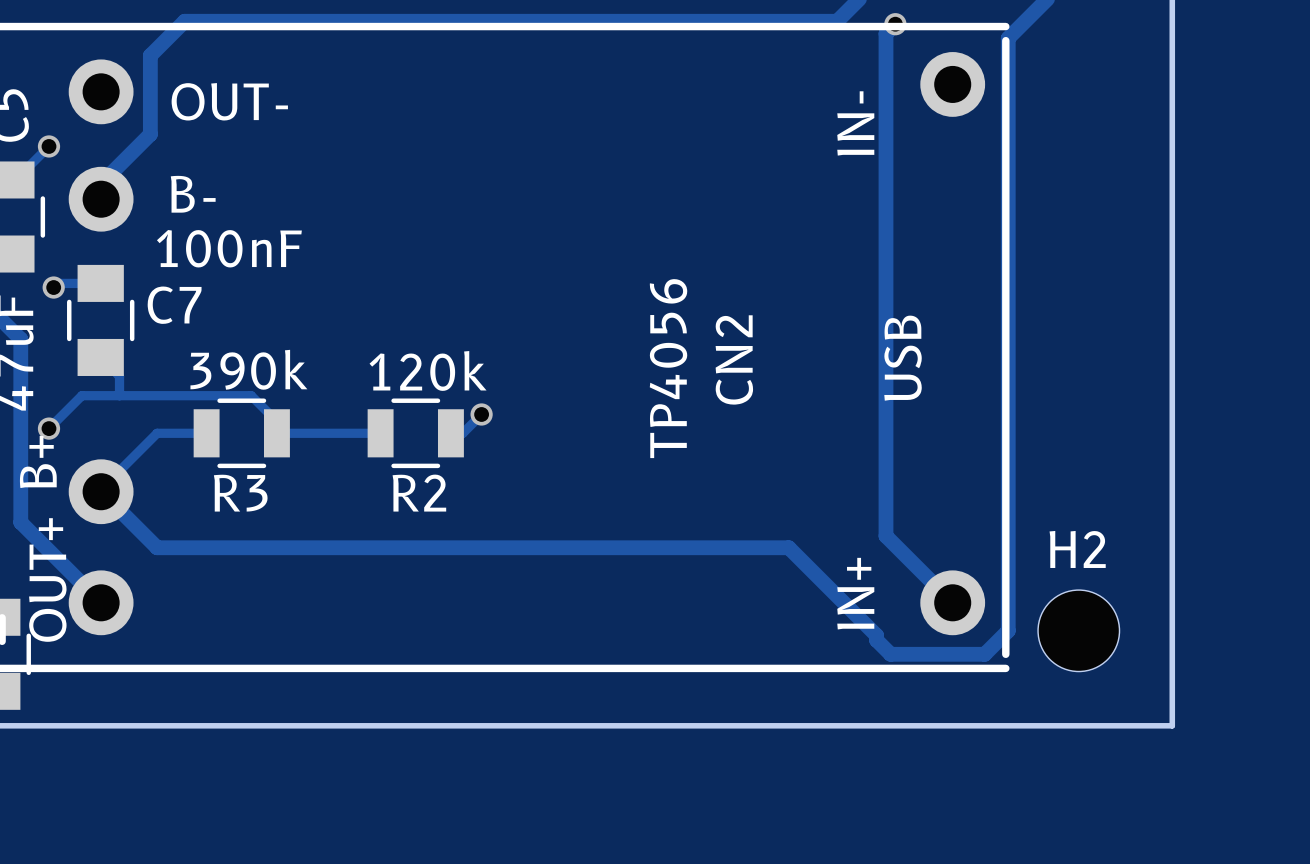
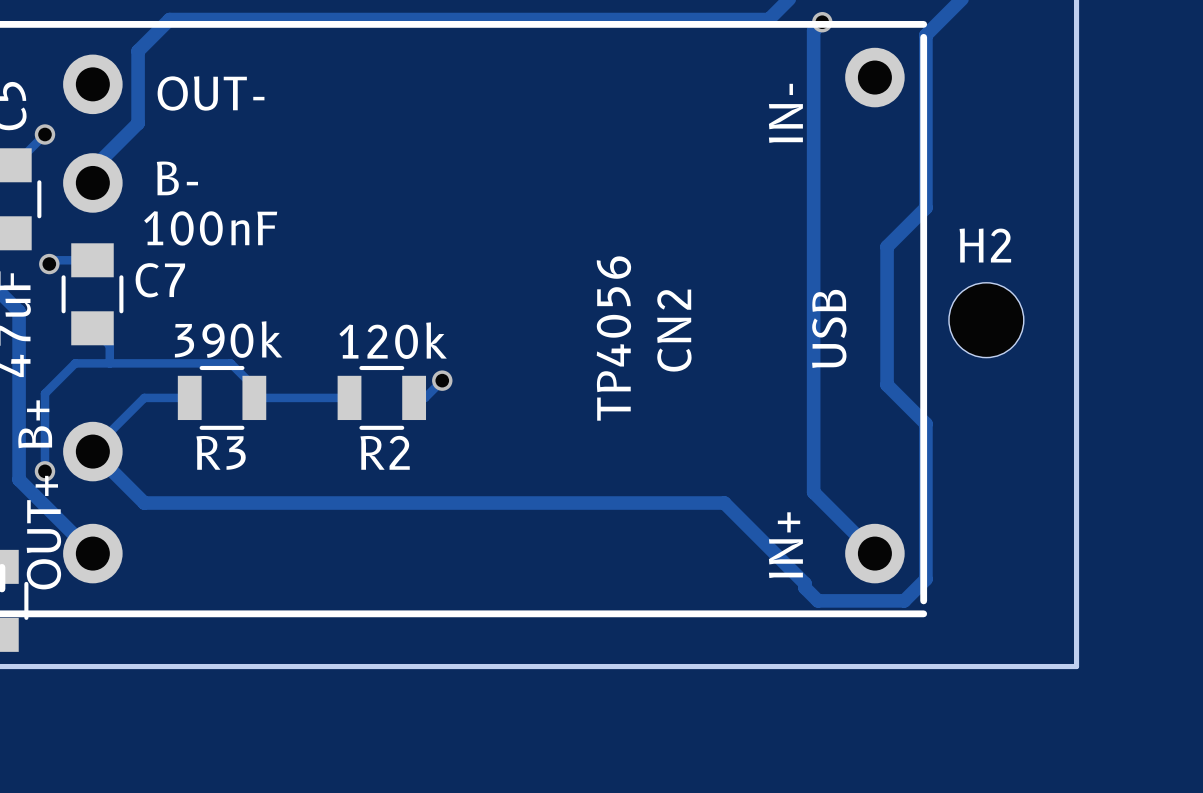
track: (1008, 226) (1008, 461) -> (925, 207) (887, 246) (887, 384) (925, 423)
track: none -> (44, 393) (44, 471)
via position: (48, 428) -> (44, 471)
H2 position: (1078, 630) -> (986, 320)

